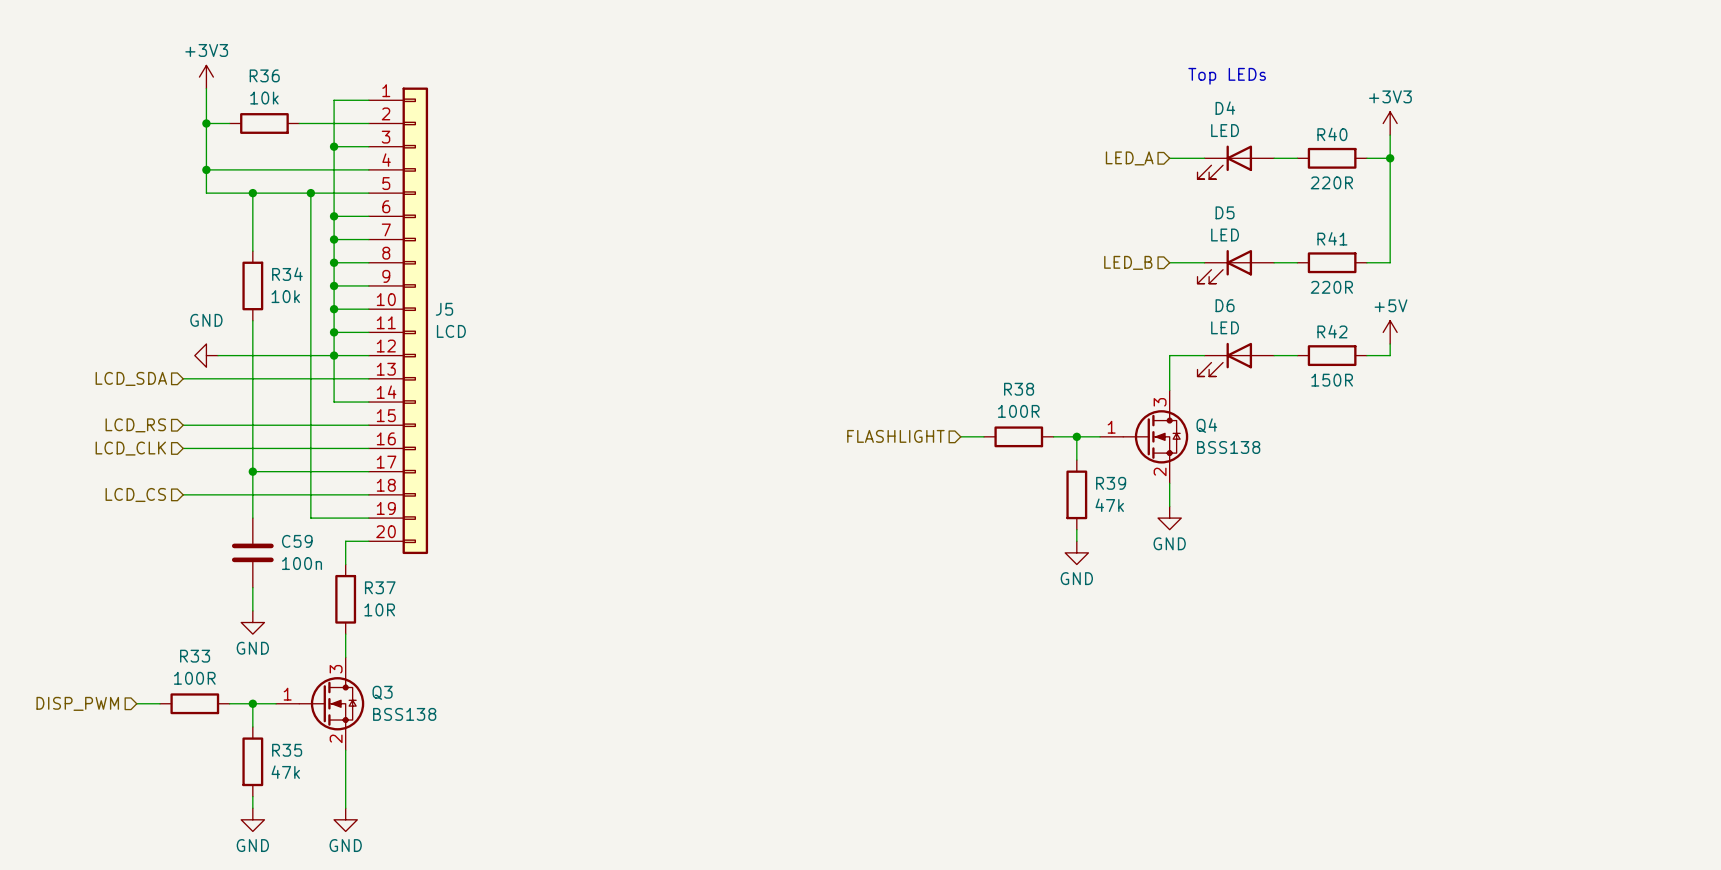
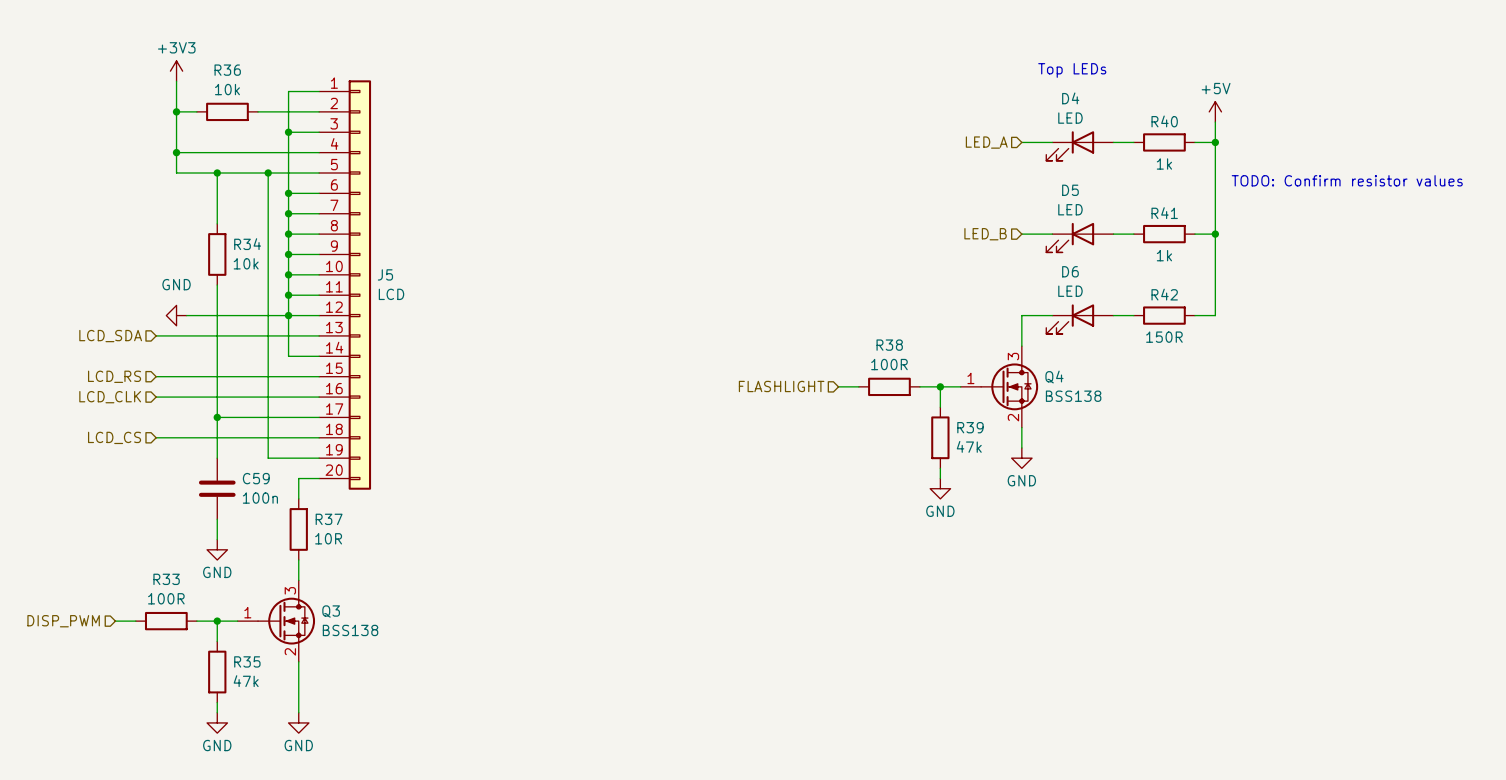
power symbol: +3V3 (1390, 123) -> +5V (1215, 111)
R40 value: 220R (1331, 182) -> 1k (1164, 164)
text: none -> TODO: Confirm resistor values (1347, 180)
wire: none -> (1215, 234) (1215, 305)
junction: none -> (1215, 234)
R41 value: 220R (1331, 287) -> 1k (1164, 255)
power symbol: +5V (1390, 332) -> none

